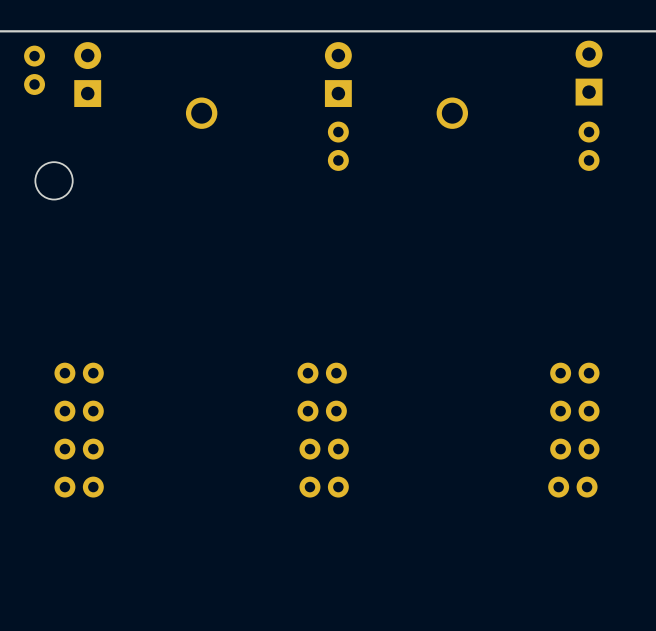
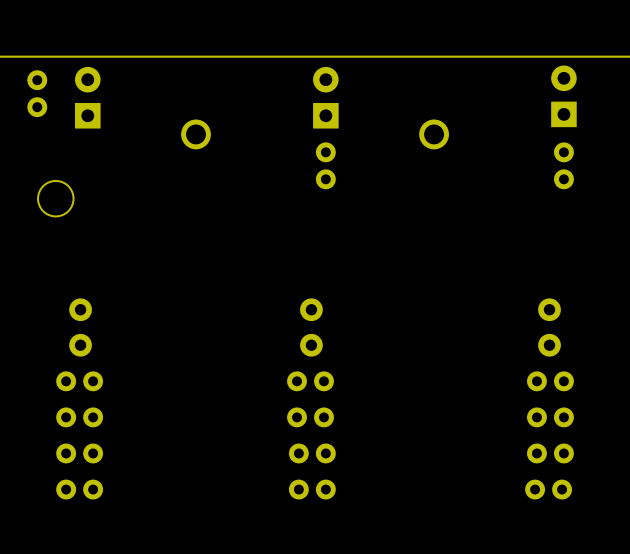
part: none -> (80, 327)
part: none -> (311, 327)
part: none -> (549, 327)

